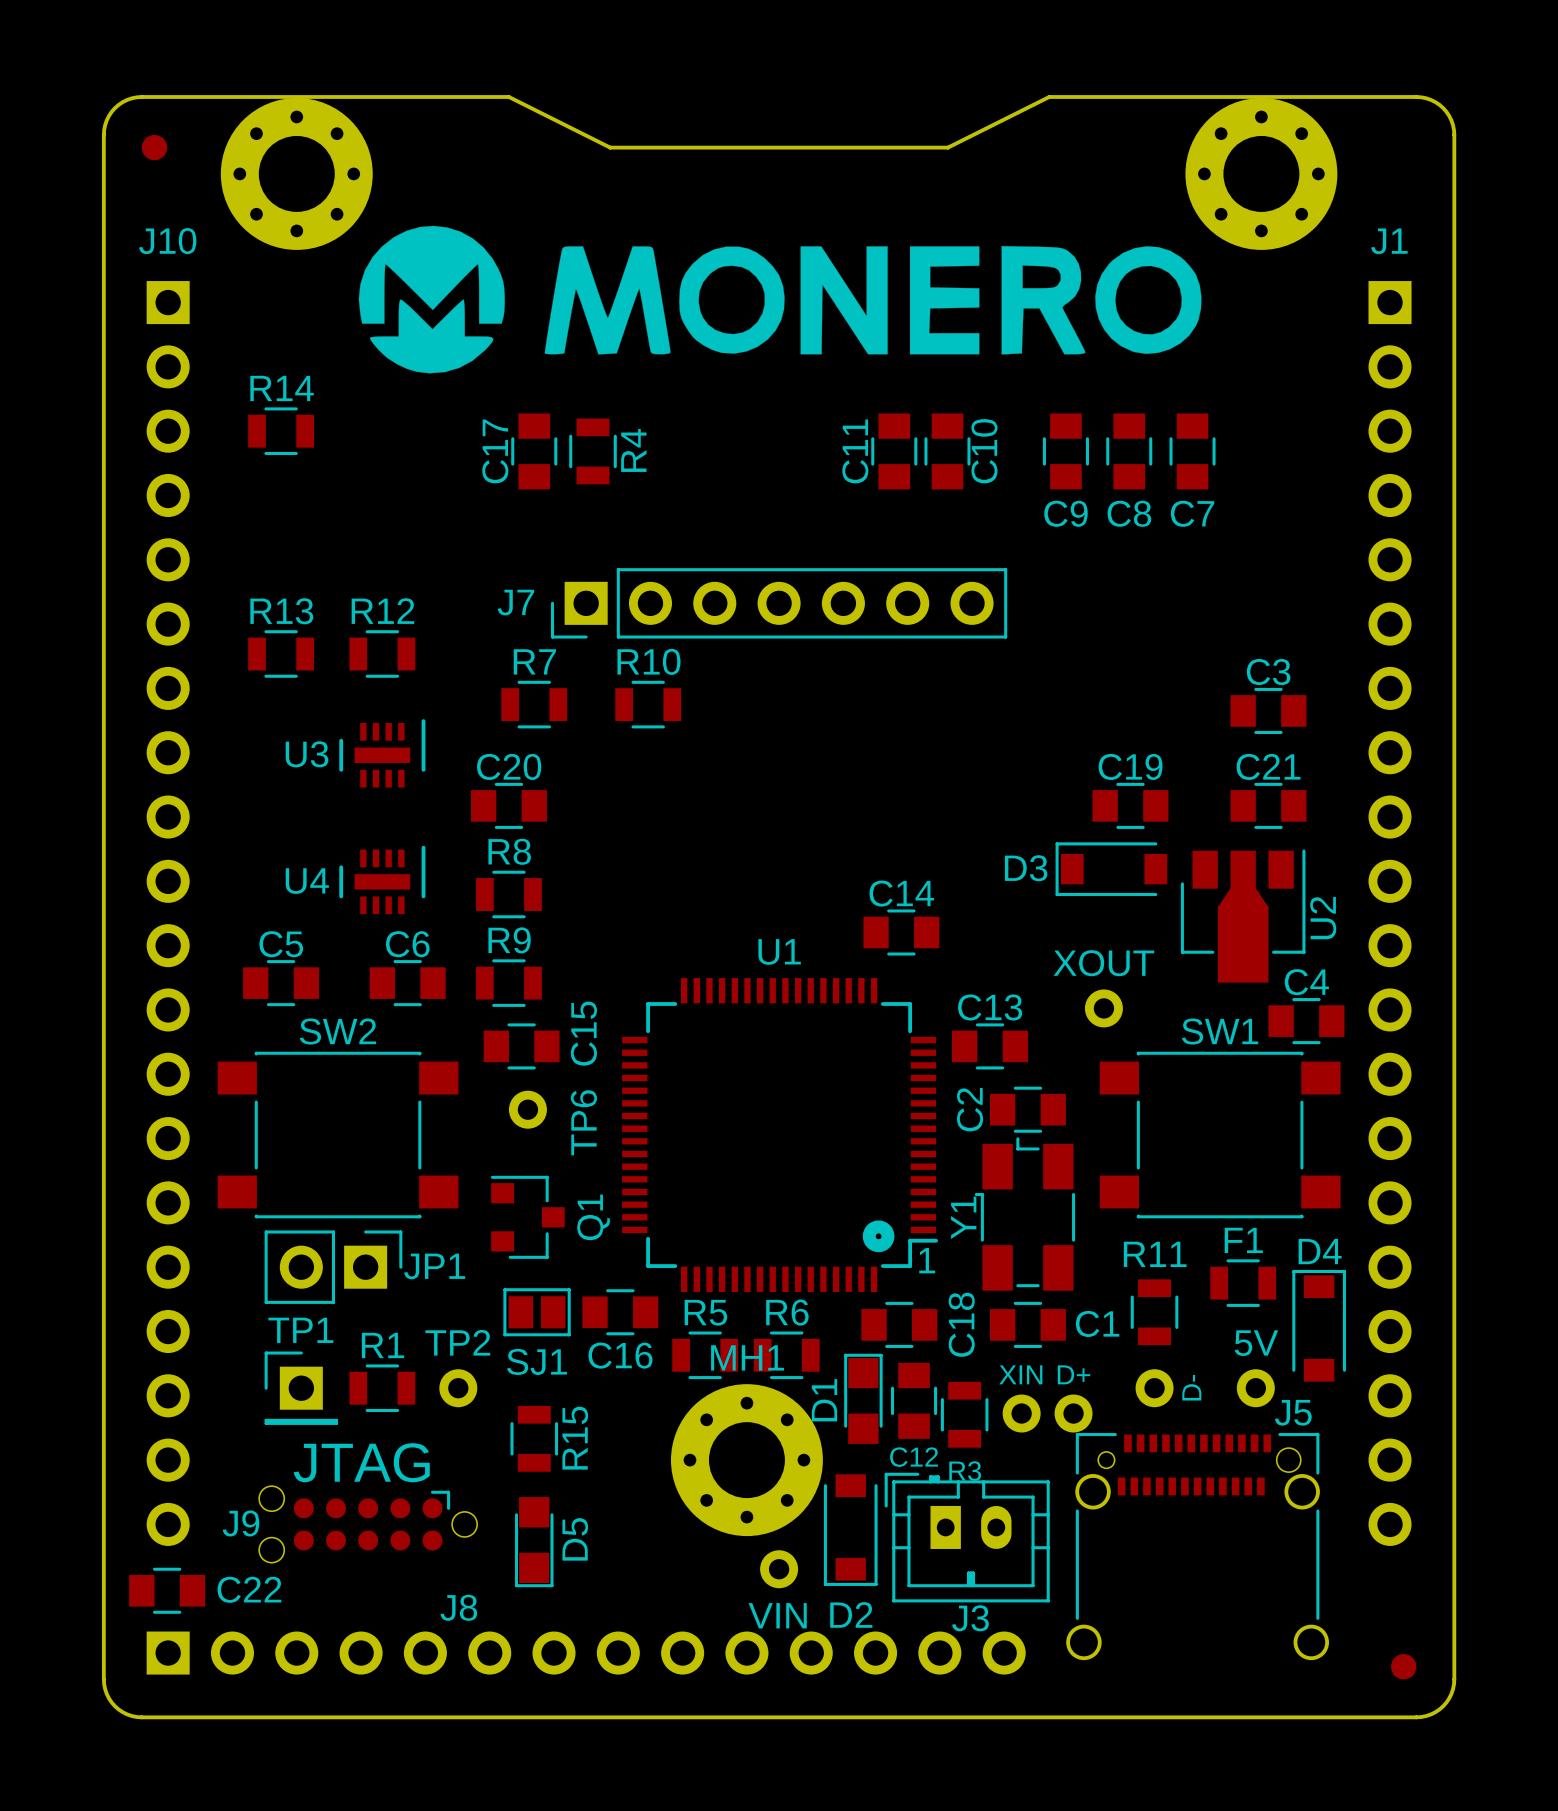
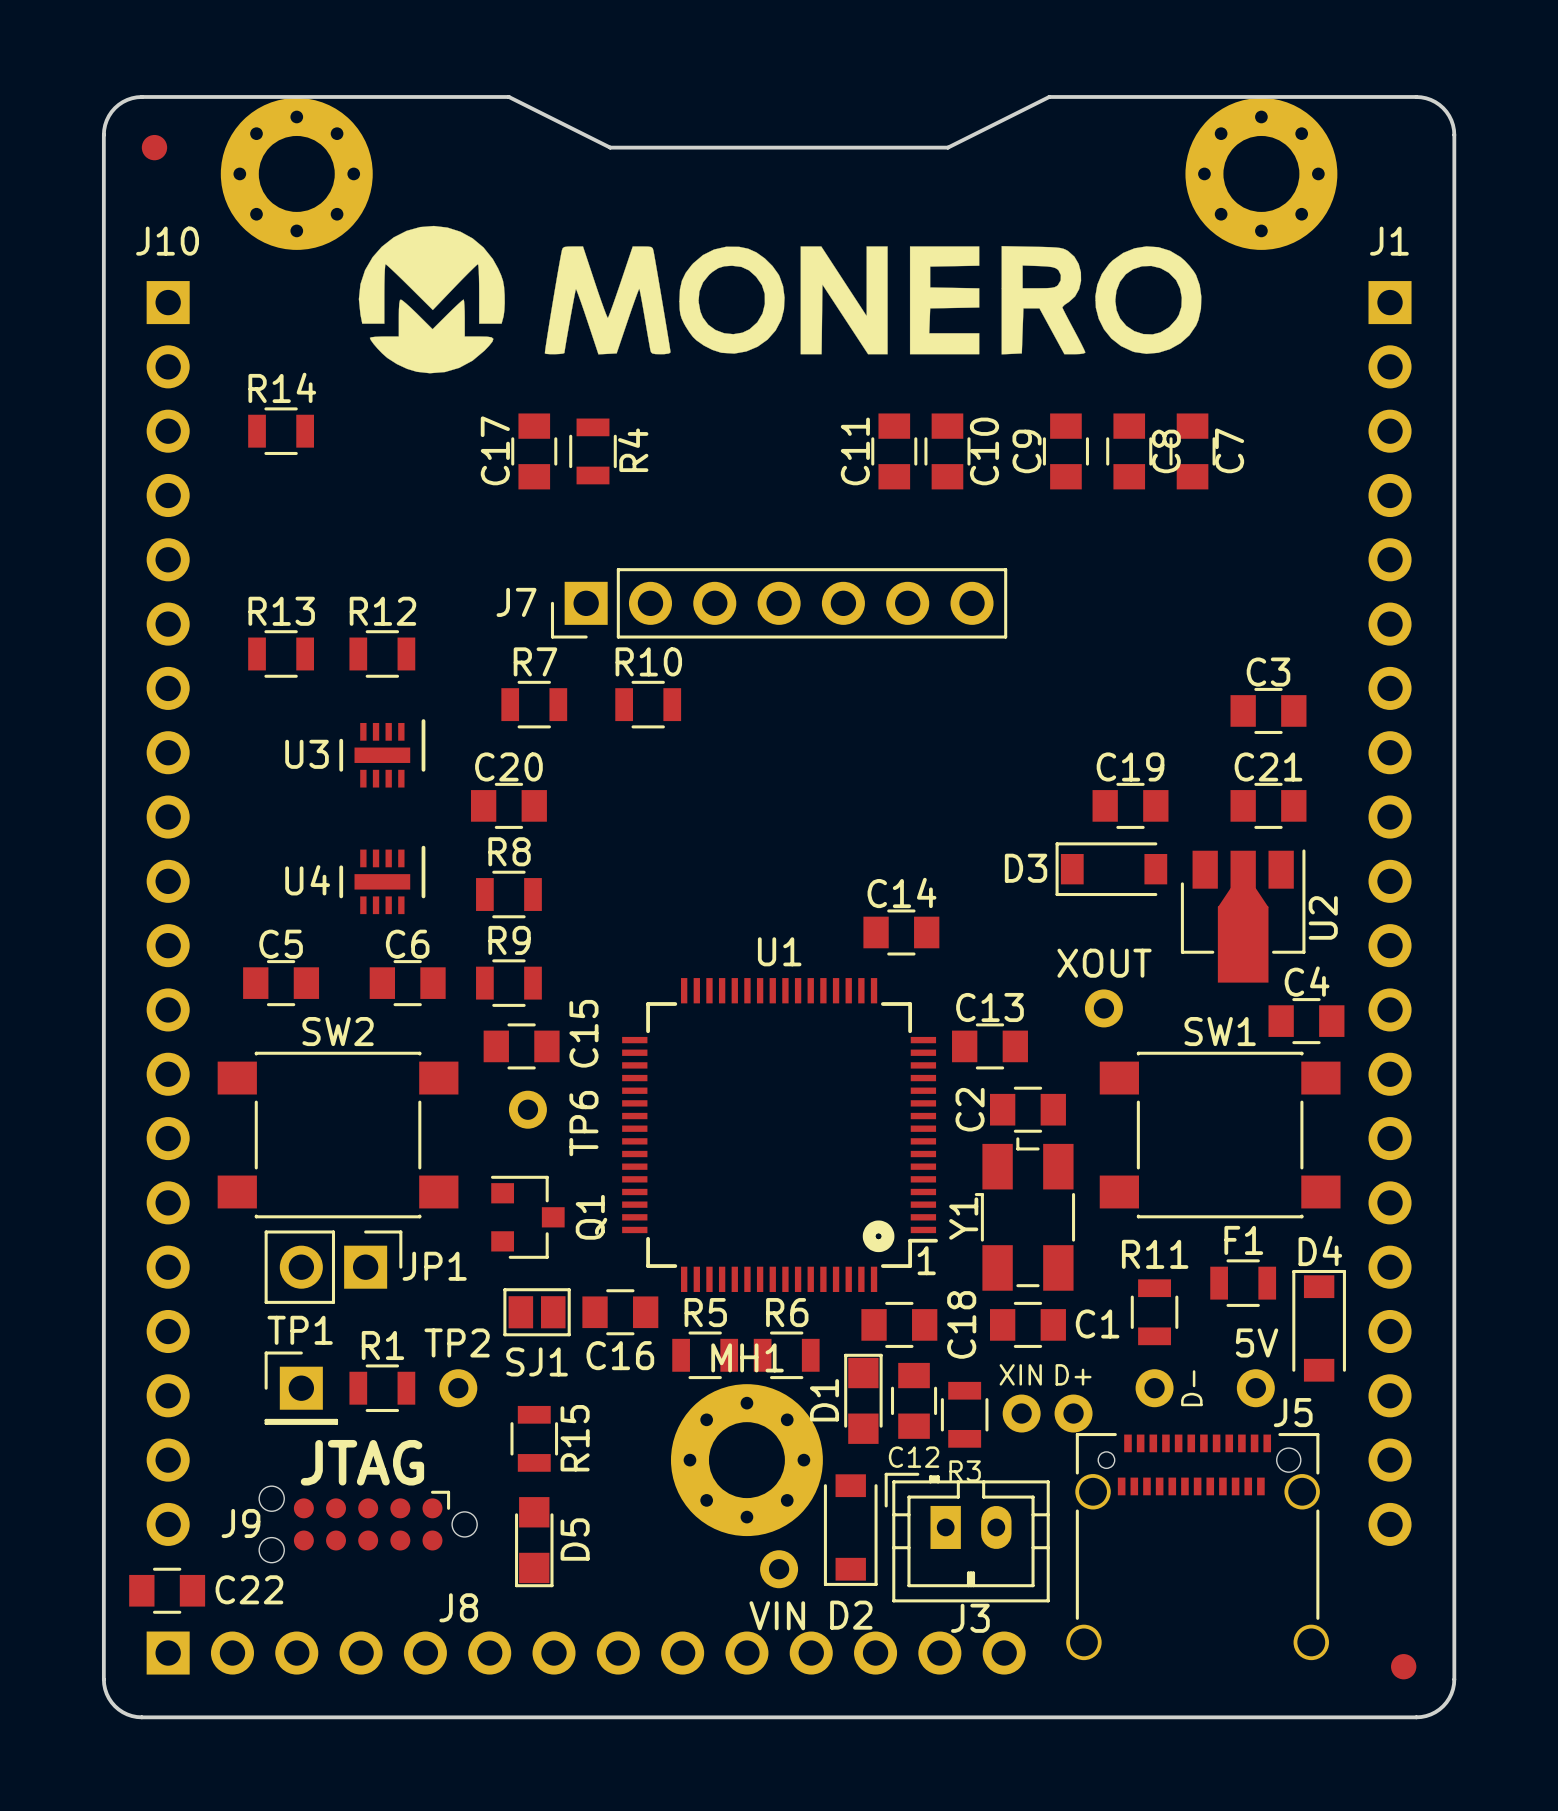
C9 name rotation: 0° (1066, 513) -> 90° counterclockwise (1027, 451)
C9 name position: C9 (1066, 513) -> C9 (1027, 451)
C8 name rotation: 0° (1129, 513) -> 90° counterclockwise (1166, 451)
C8 name position: C8 (1129, 513) -> C8 (1166, 451)
C7 name rotation: 0° (1192, 513) -> 90° counterclockwise (1229, 450)
C7 name position: C7 (1192, 513) -> C7 (1229, 450)

